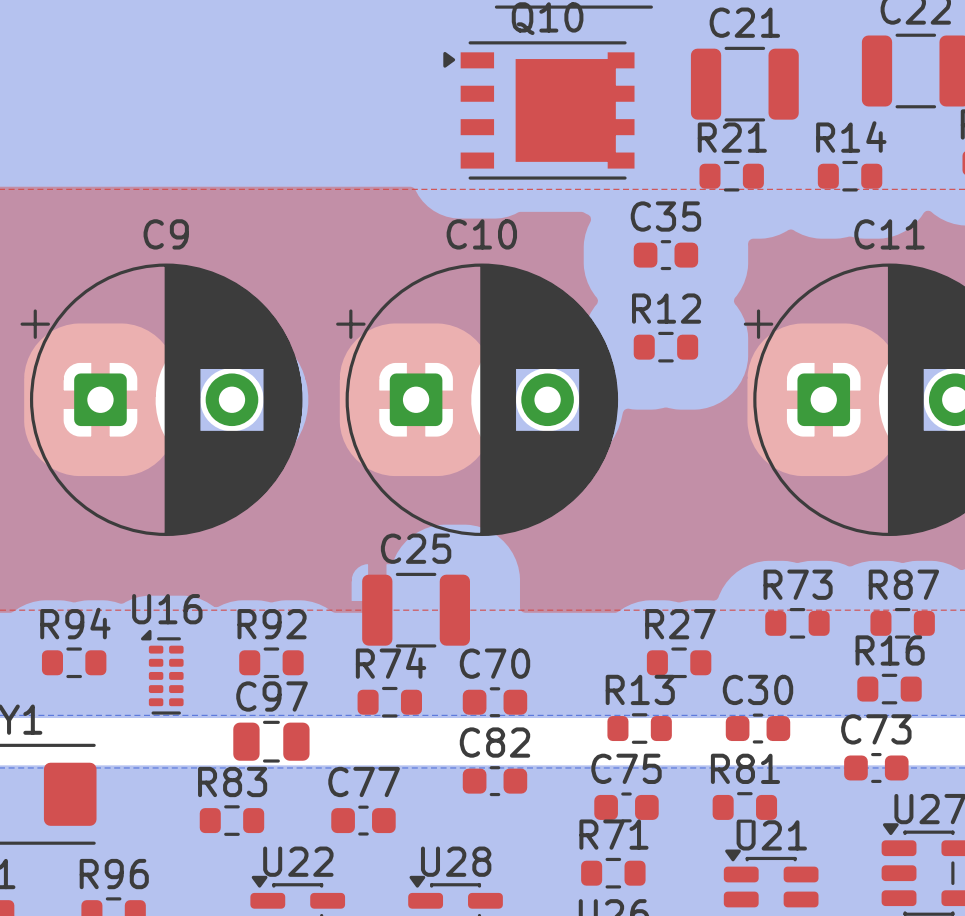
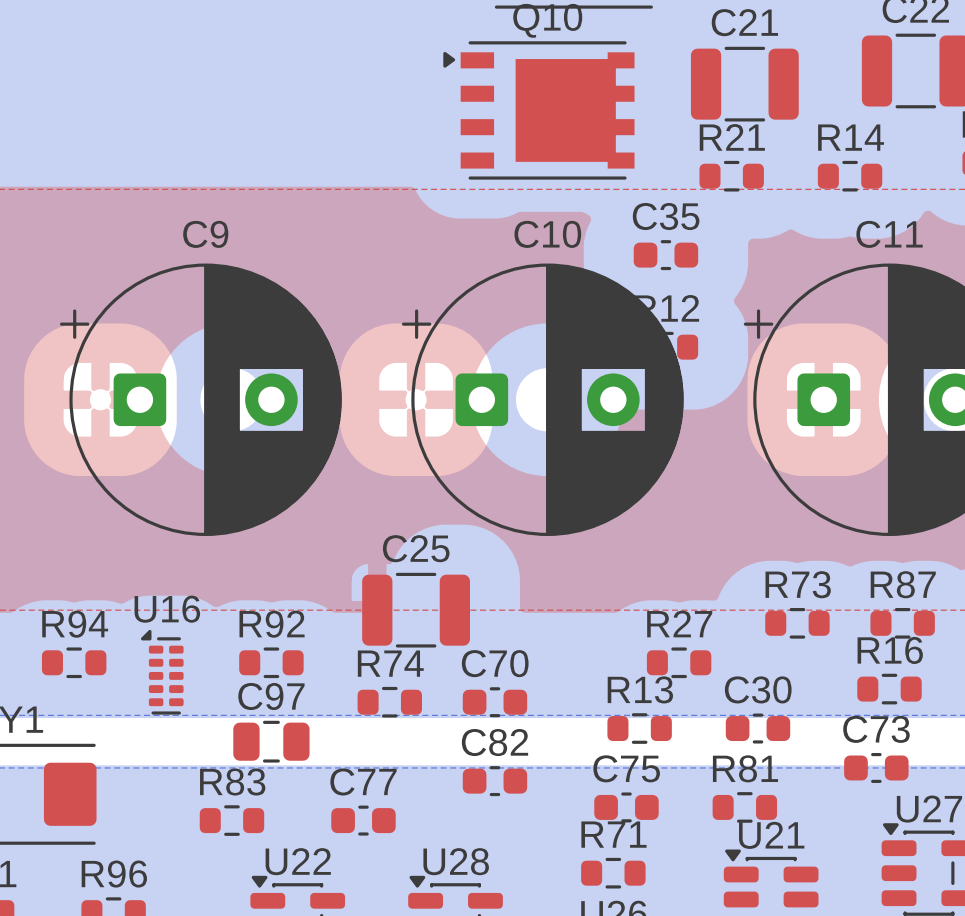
C9 position: (161, 399) -> (200, 399)
C10 position: (477, 399) -> (542, 399)

